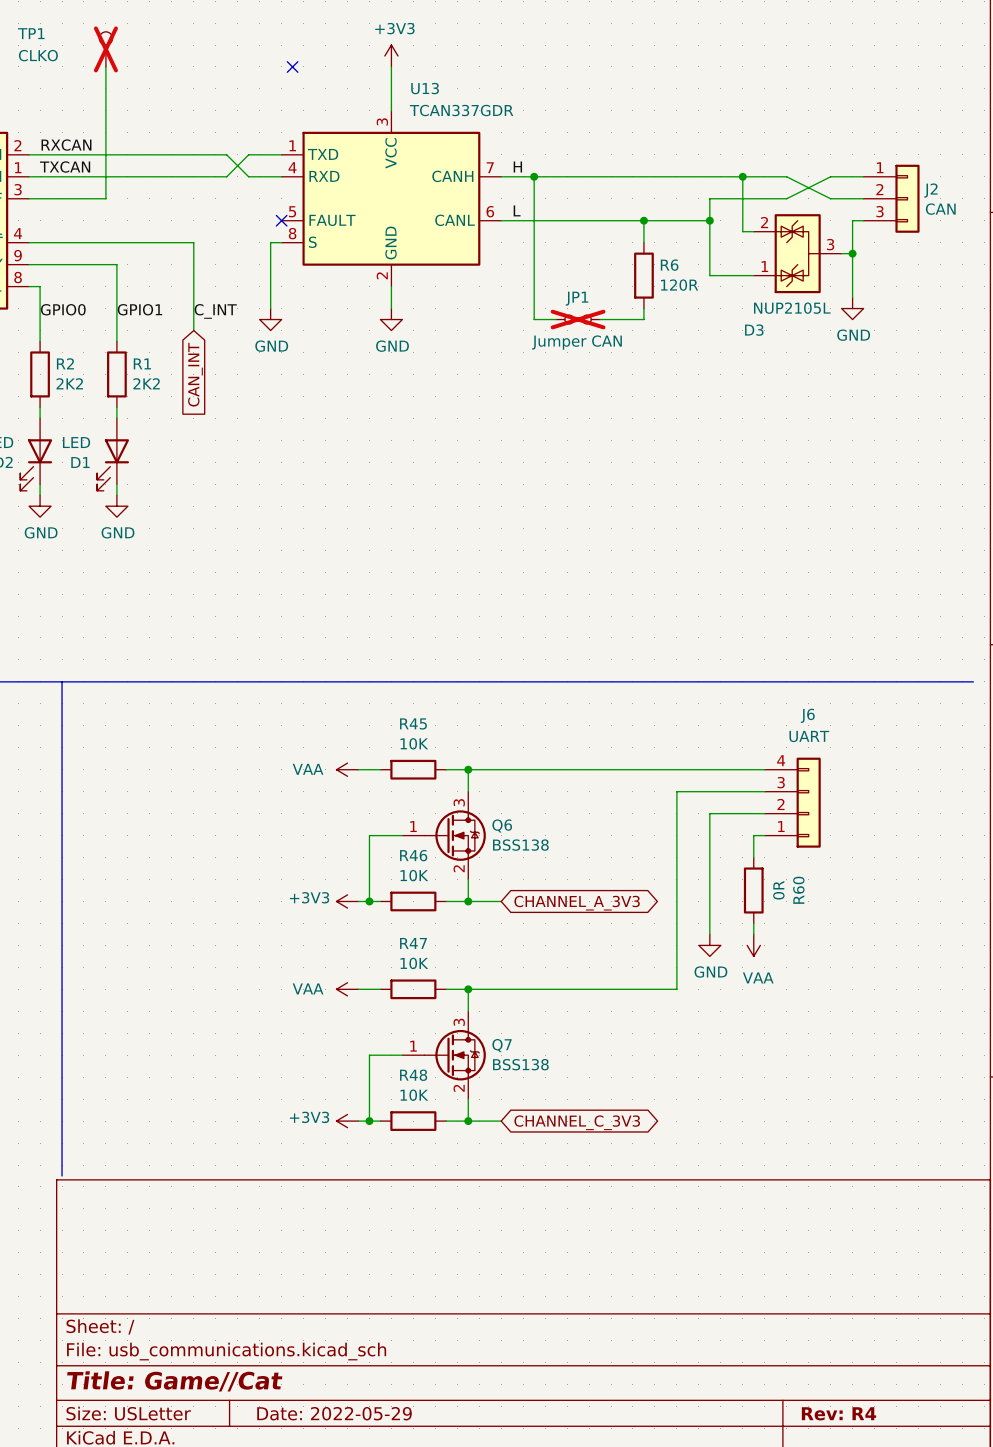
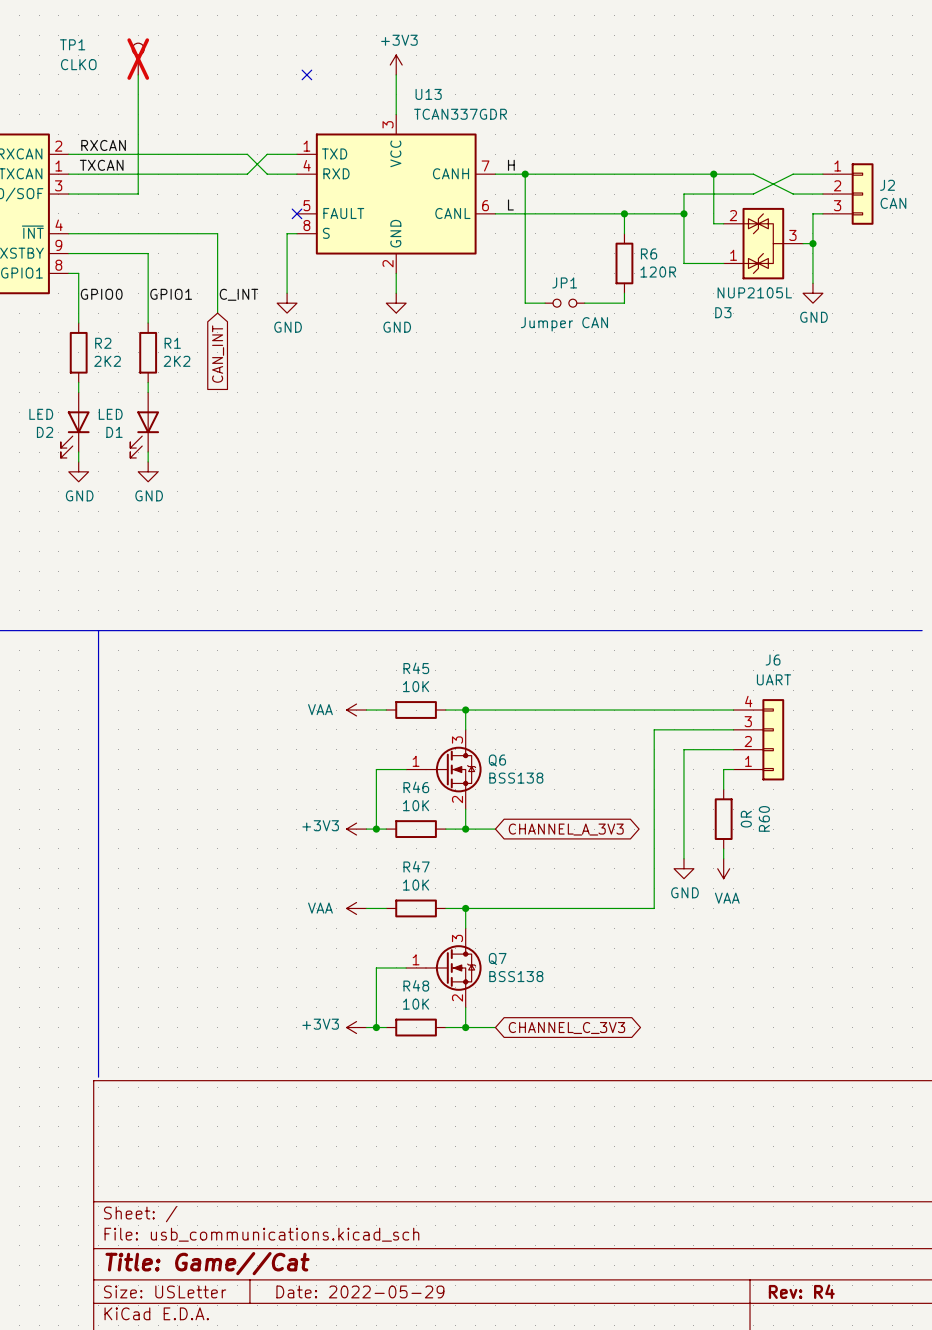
JP1 do-not-place cross: (578, 319) -> none

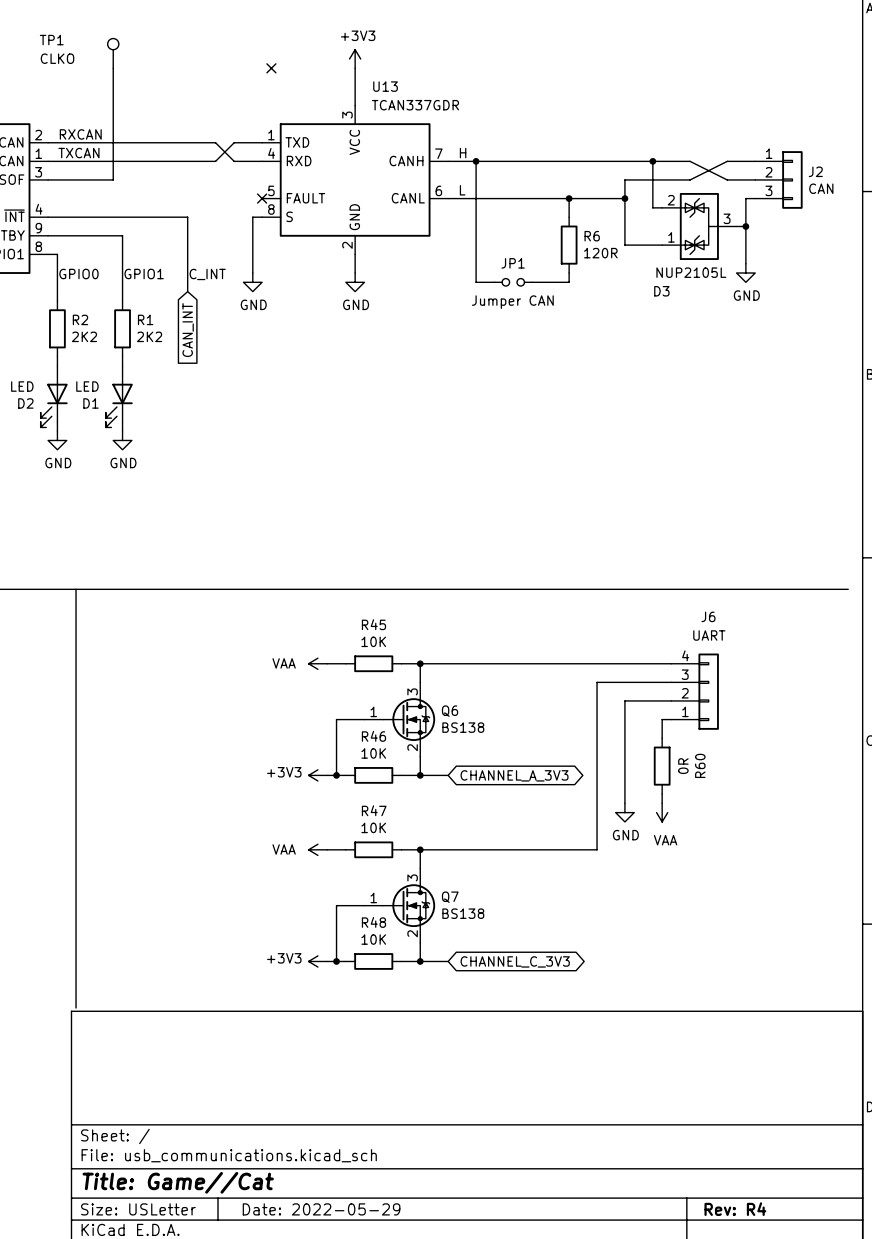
TP1 do-not-place cross: (138, 59) -> none
Q6 value: BSS138 (516, 778) -> BS138 (463, 727)
Q7 value: BSS138 (516, 976) -> BS138 (463, 913)

